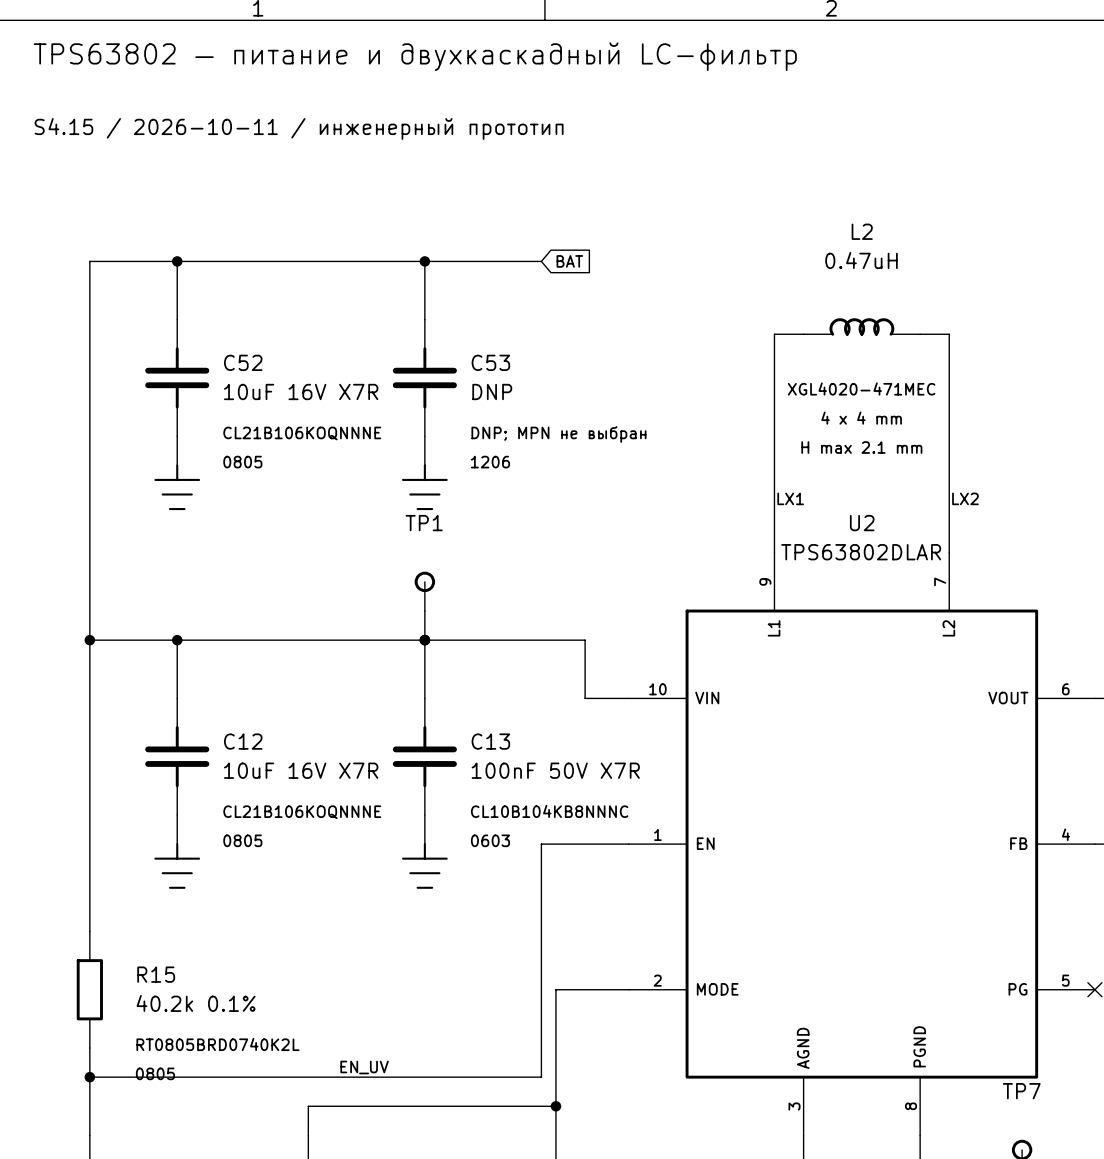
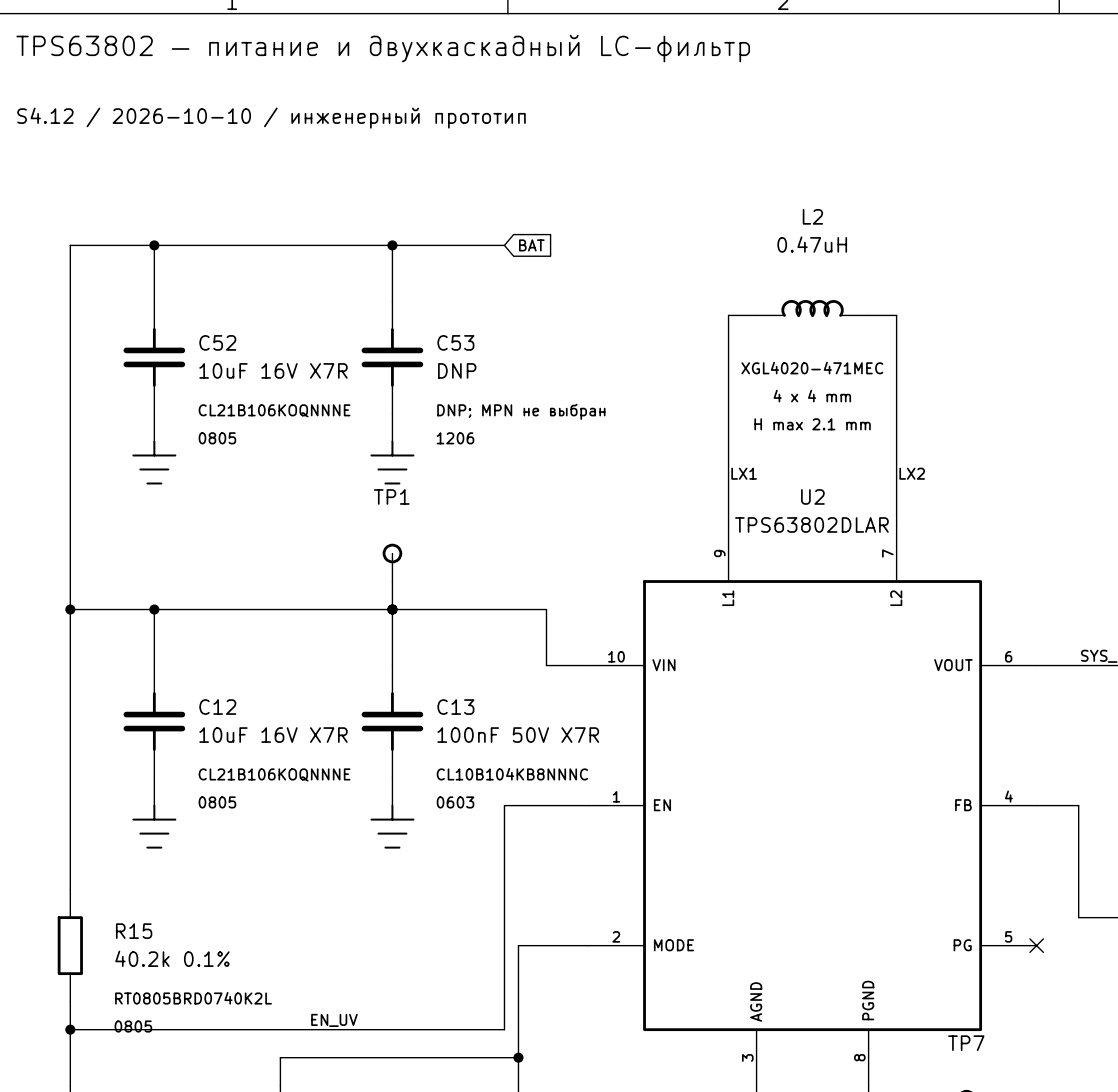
text: S4.15 / 2026-10-11 / инженерный прототип (299, 129) -> S4.12 / 2026-10-10 / инженерный прототип (271, 118)

